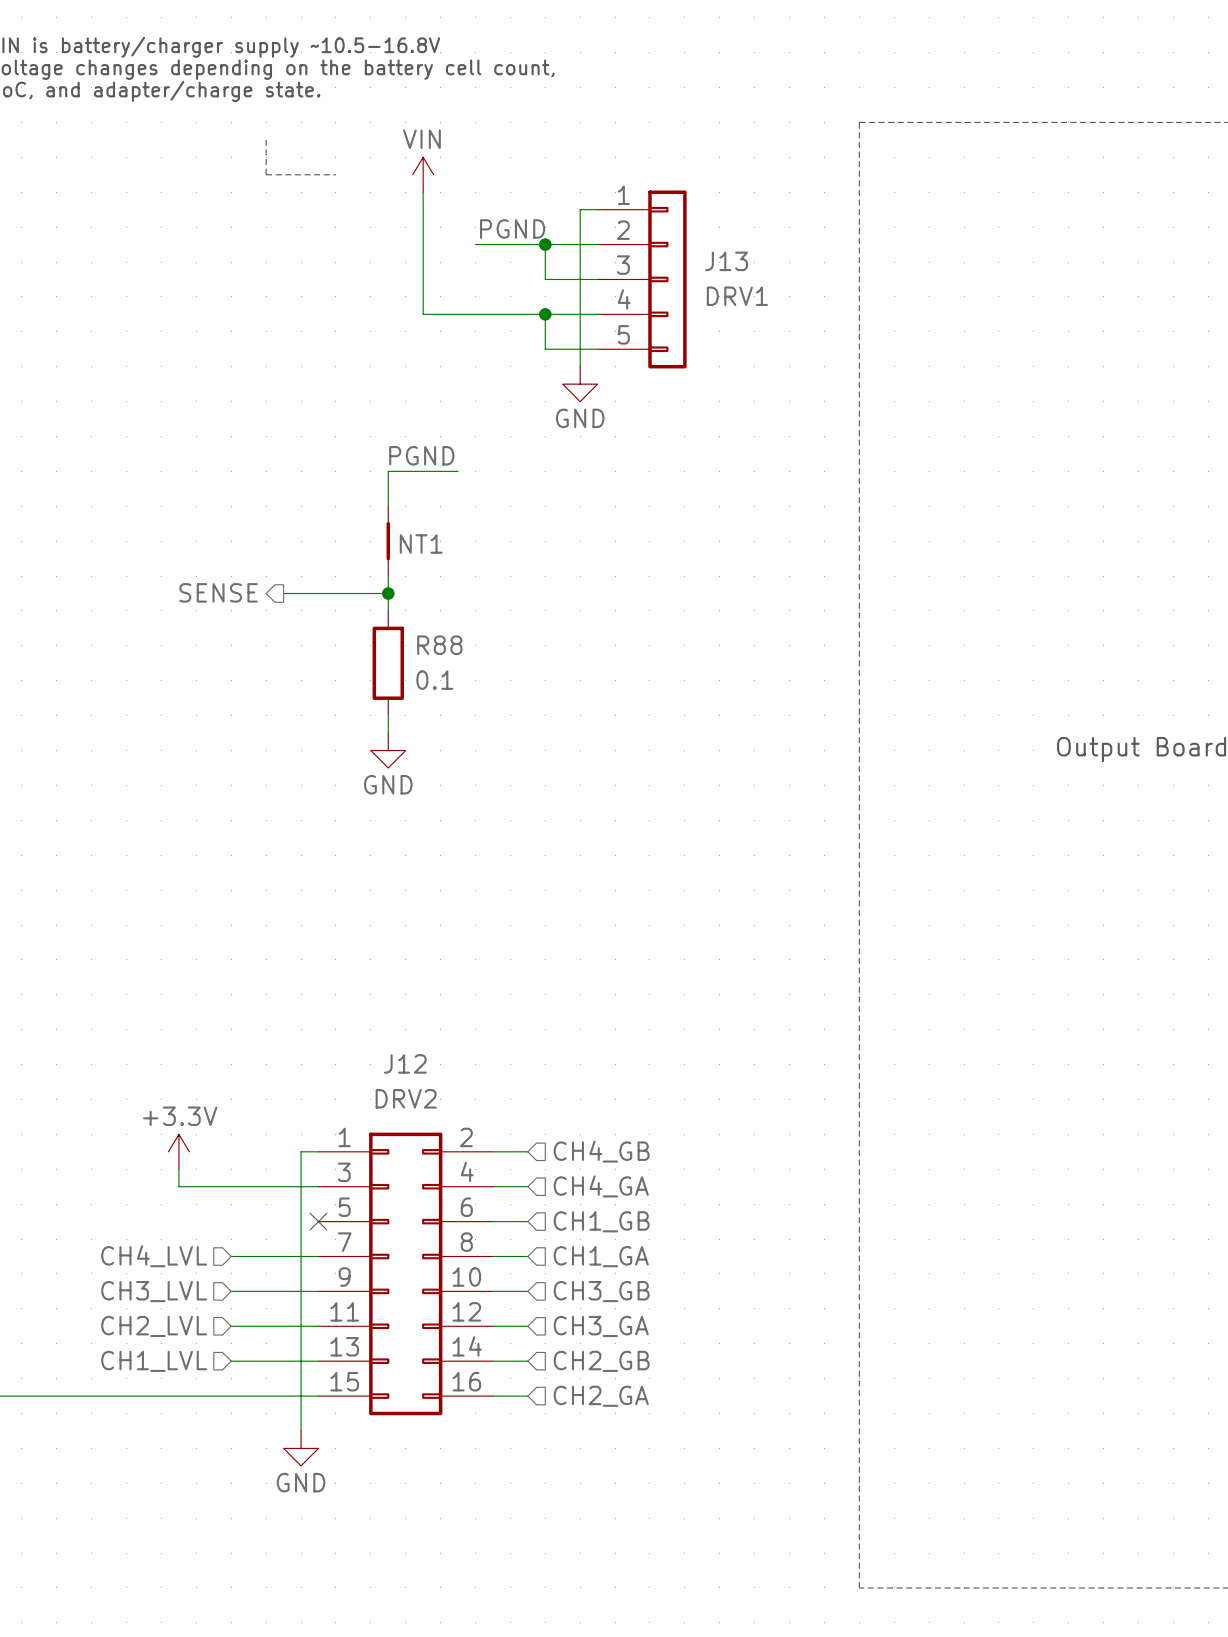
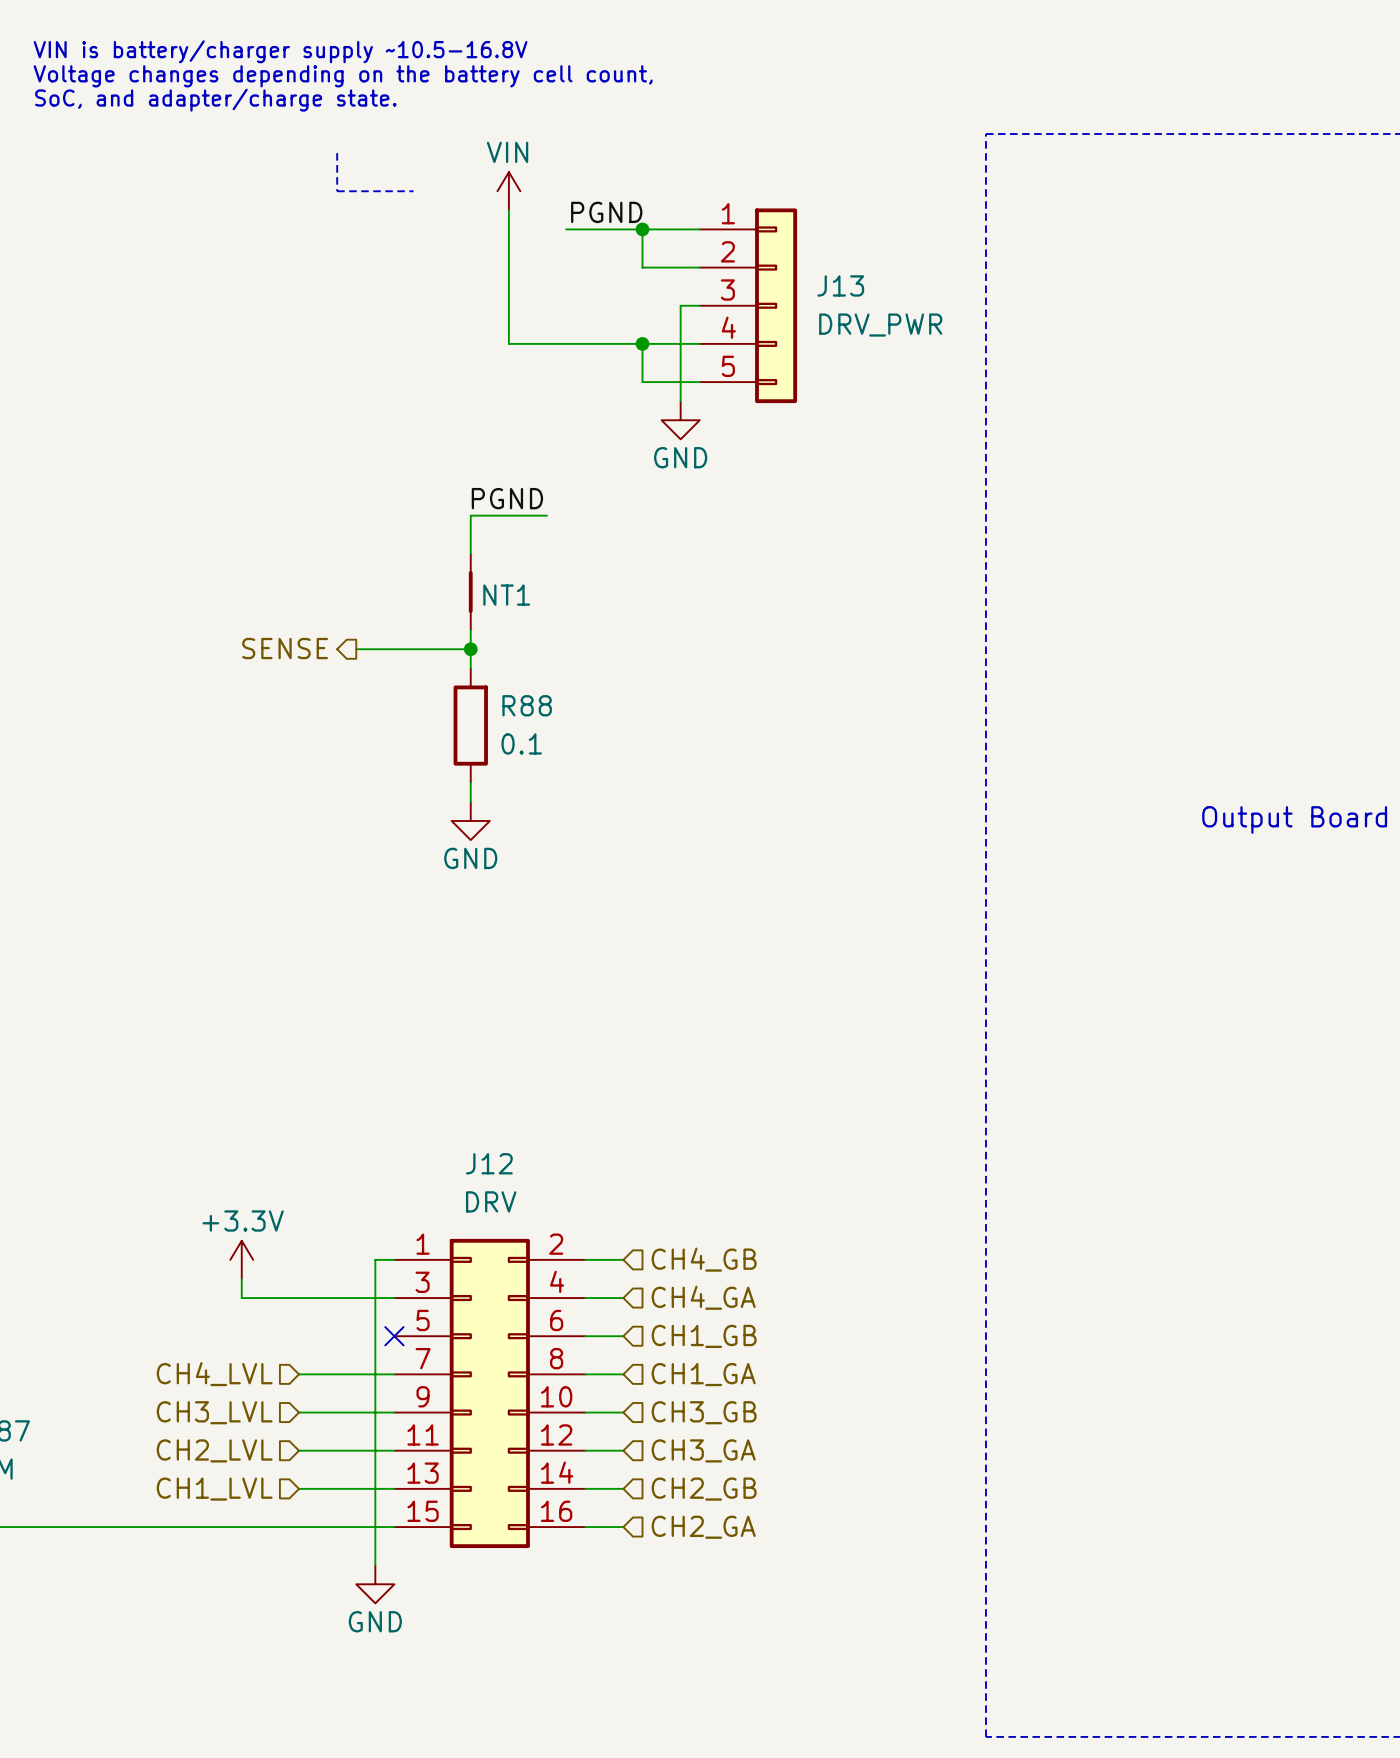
wire: none -> (642, 229) (642, 267)
wire: (580, 209) (580, 279) (545, 279) (545, 244) (475, 244) -> (680, 229) (566, 229)
label position: PGND (512, 229) -> PGND (606, 212)
junction position: (545, 244) -> (642, 229)
J13 value: DRV1 (737, 296) -> DRV_PWR (880, 325)
J12 value: DRV2 (406, 1098) -> DRV (491, 1201)

